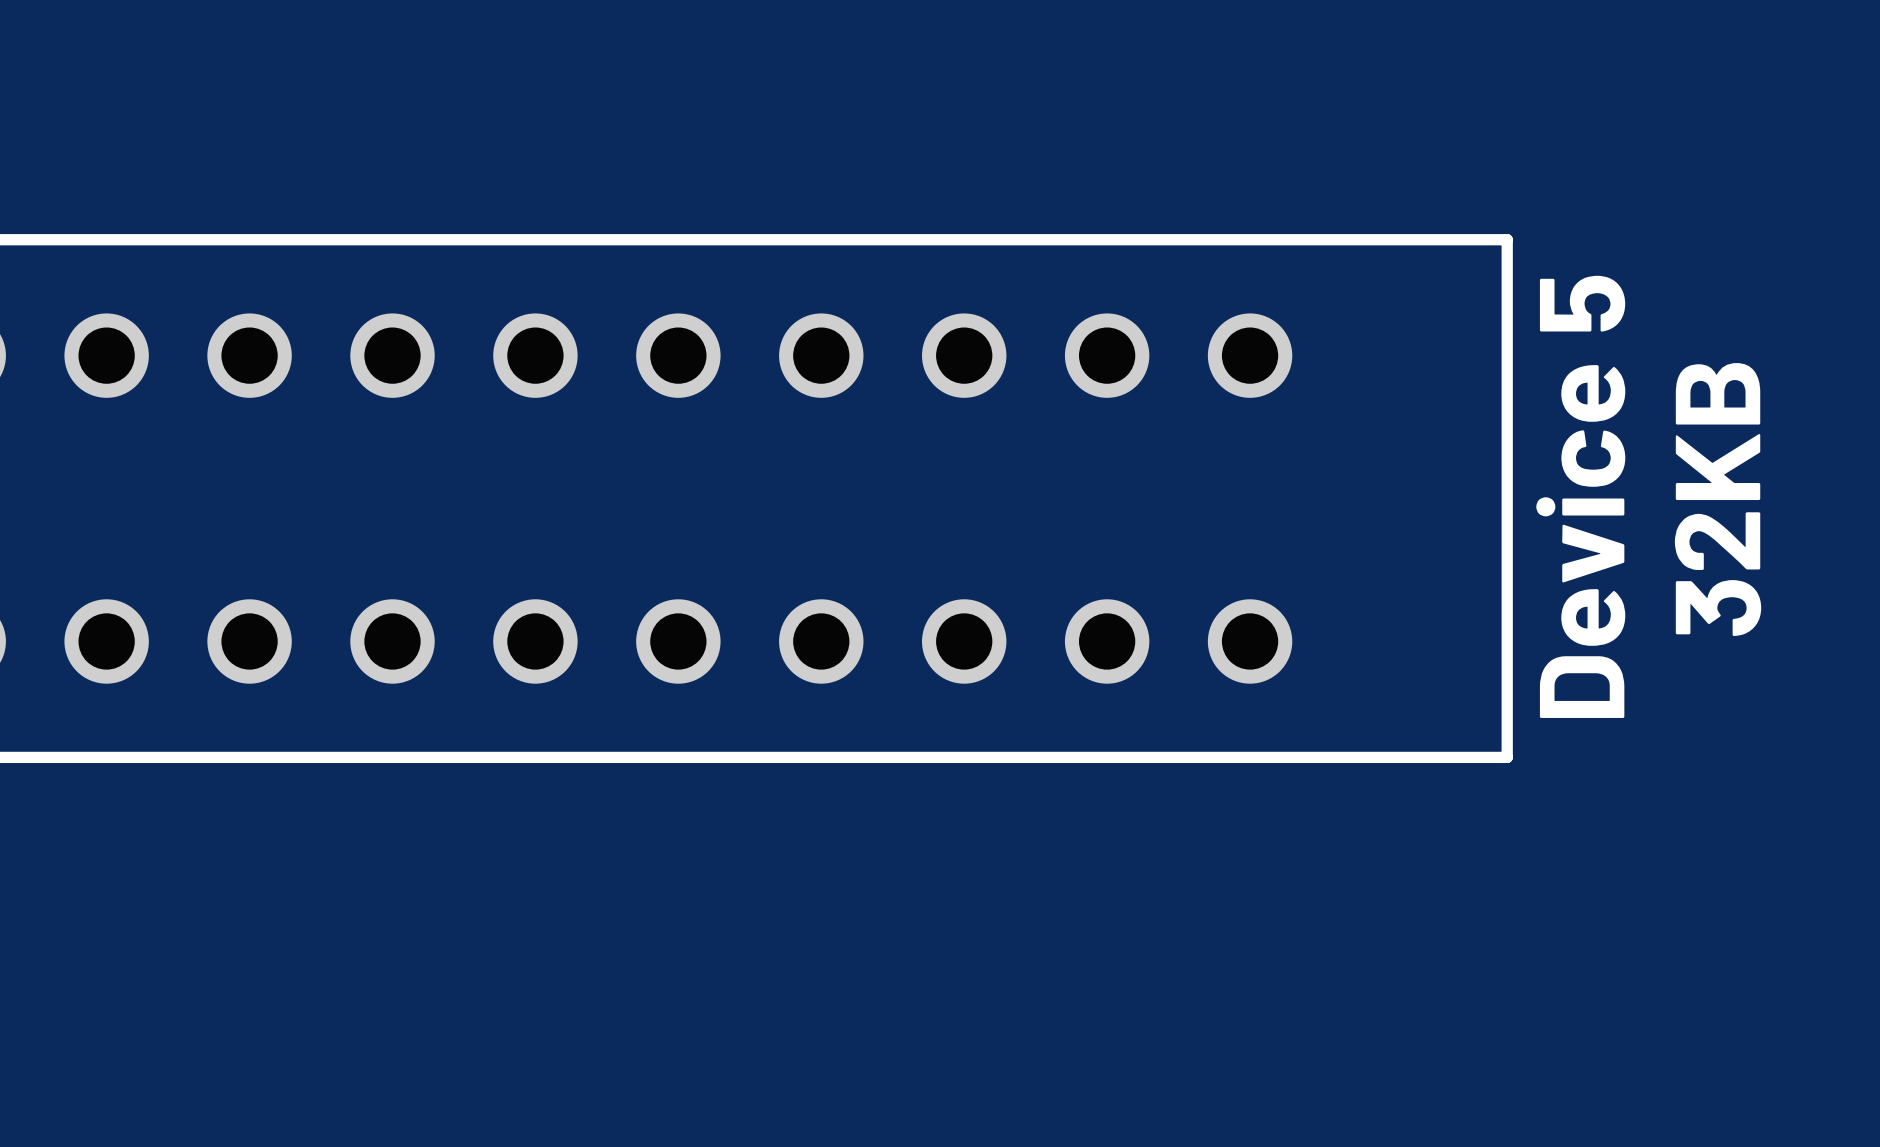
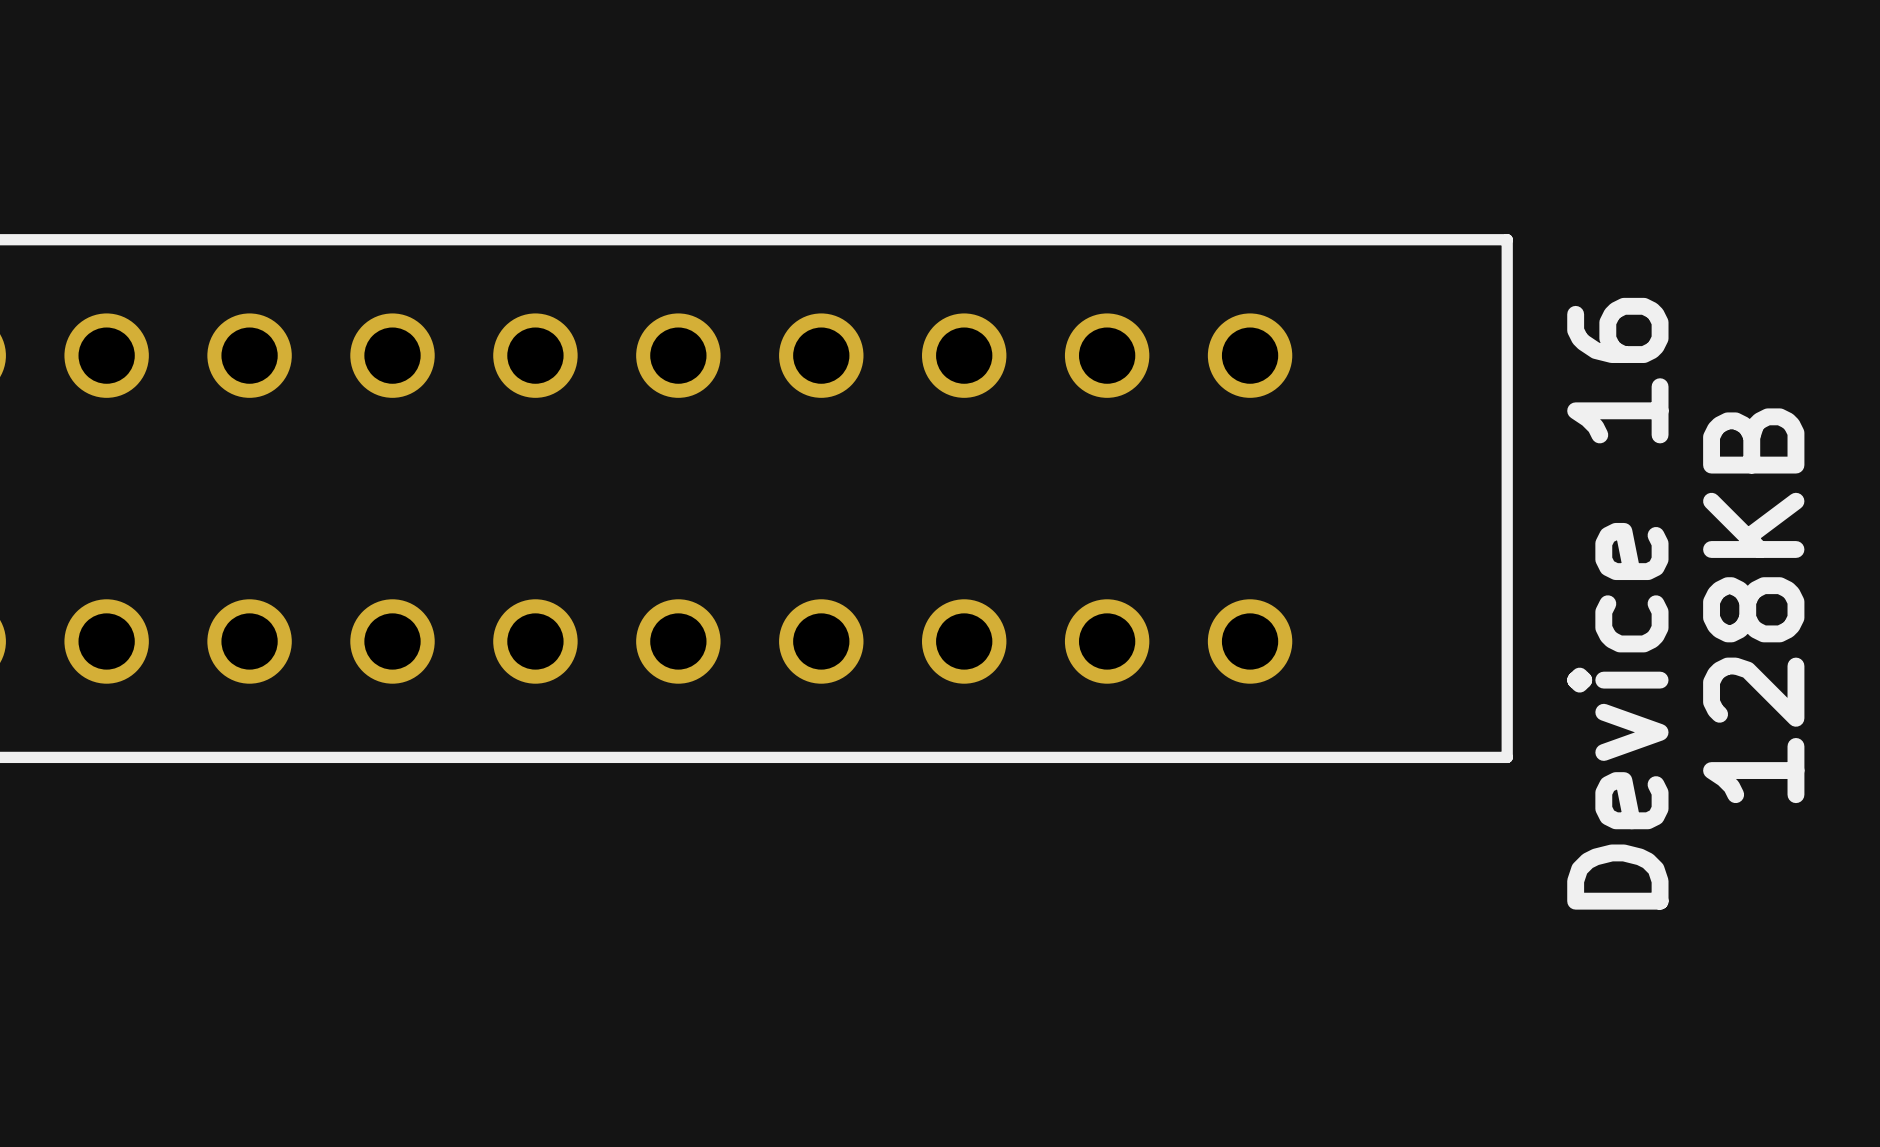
text: Device 5 (1580, 496) -> Device 16 (1617, 603)
text: 32KB (1718, 499) -> 128KB (1753, 605)

